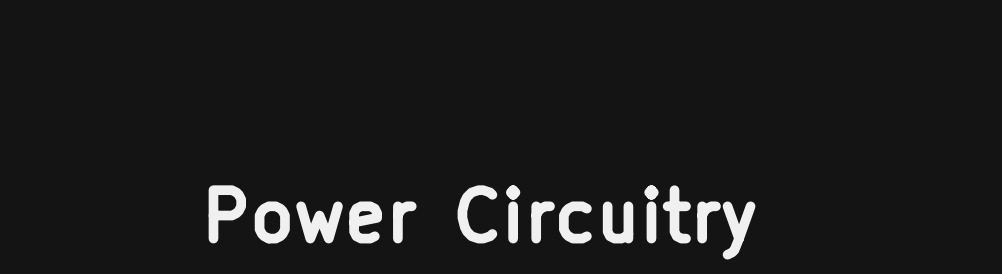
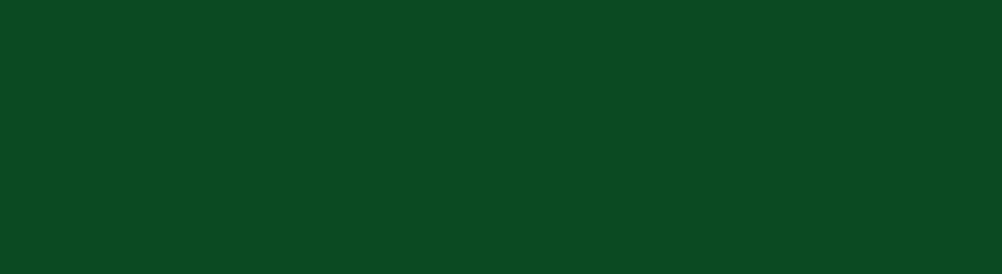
text: Power Circuitry (482, 222) -> none

